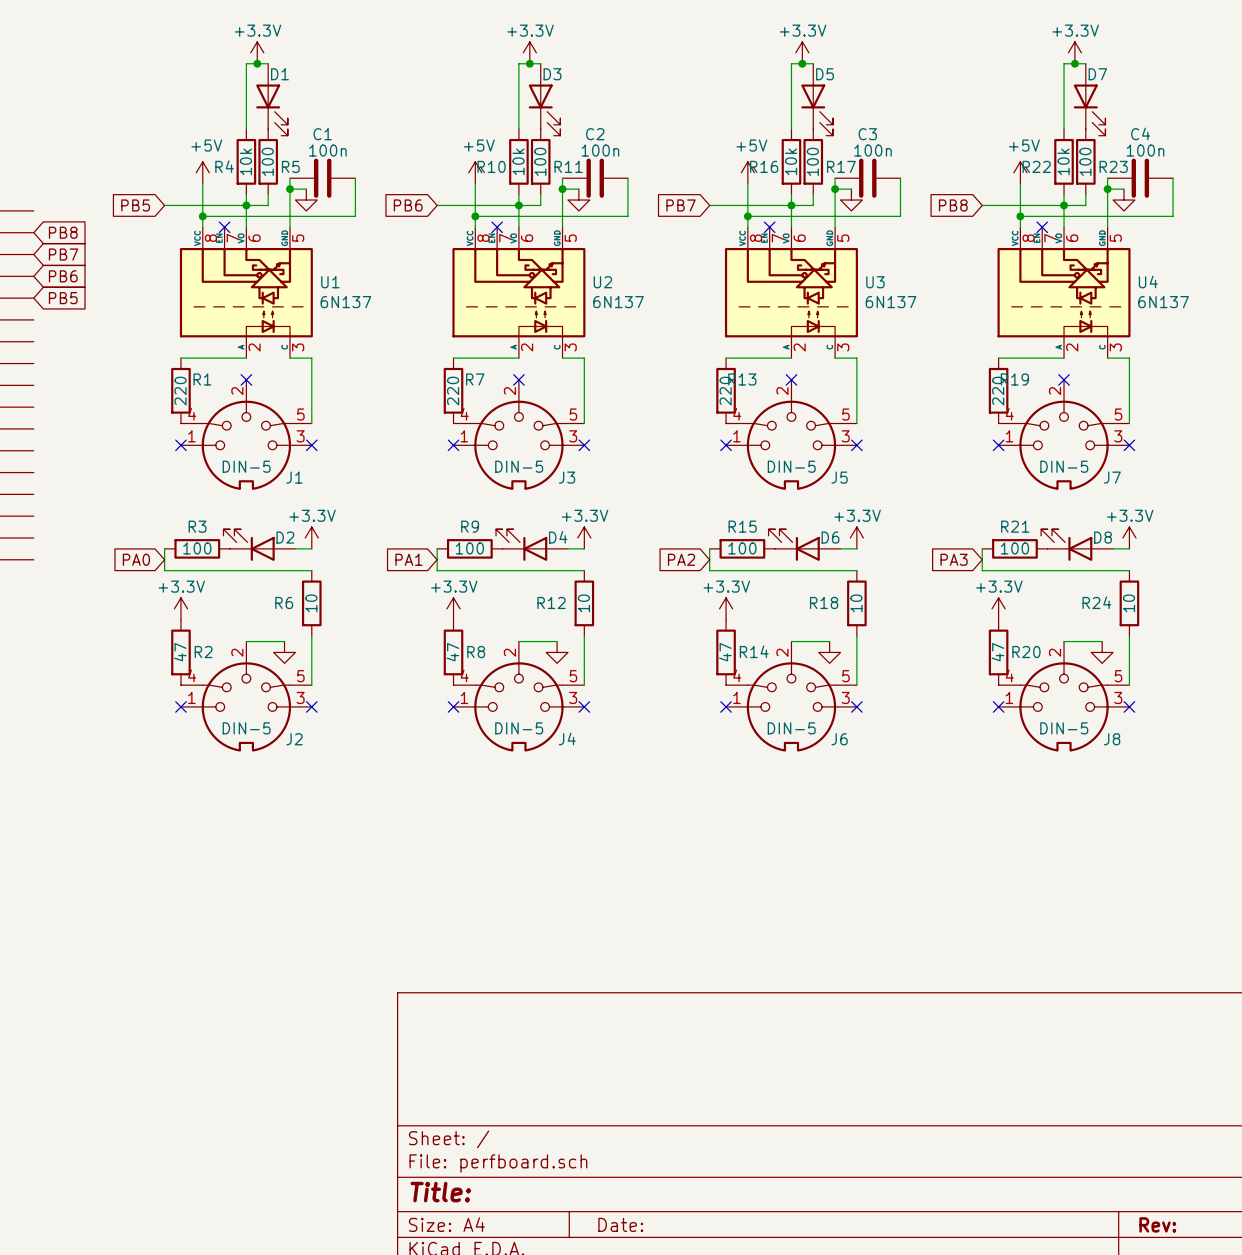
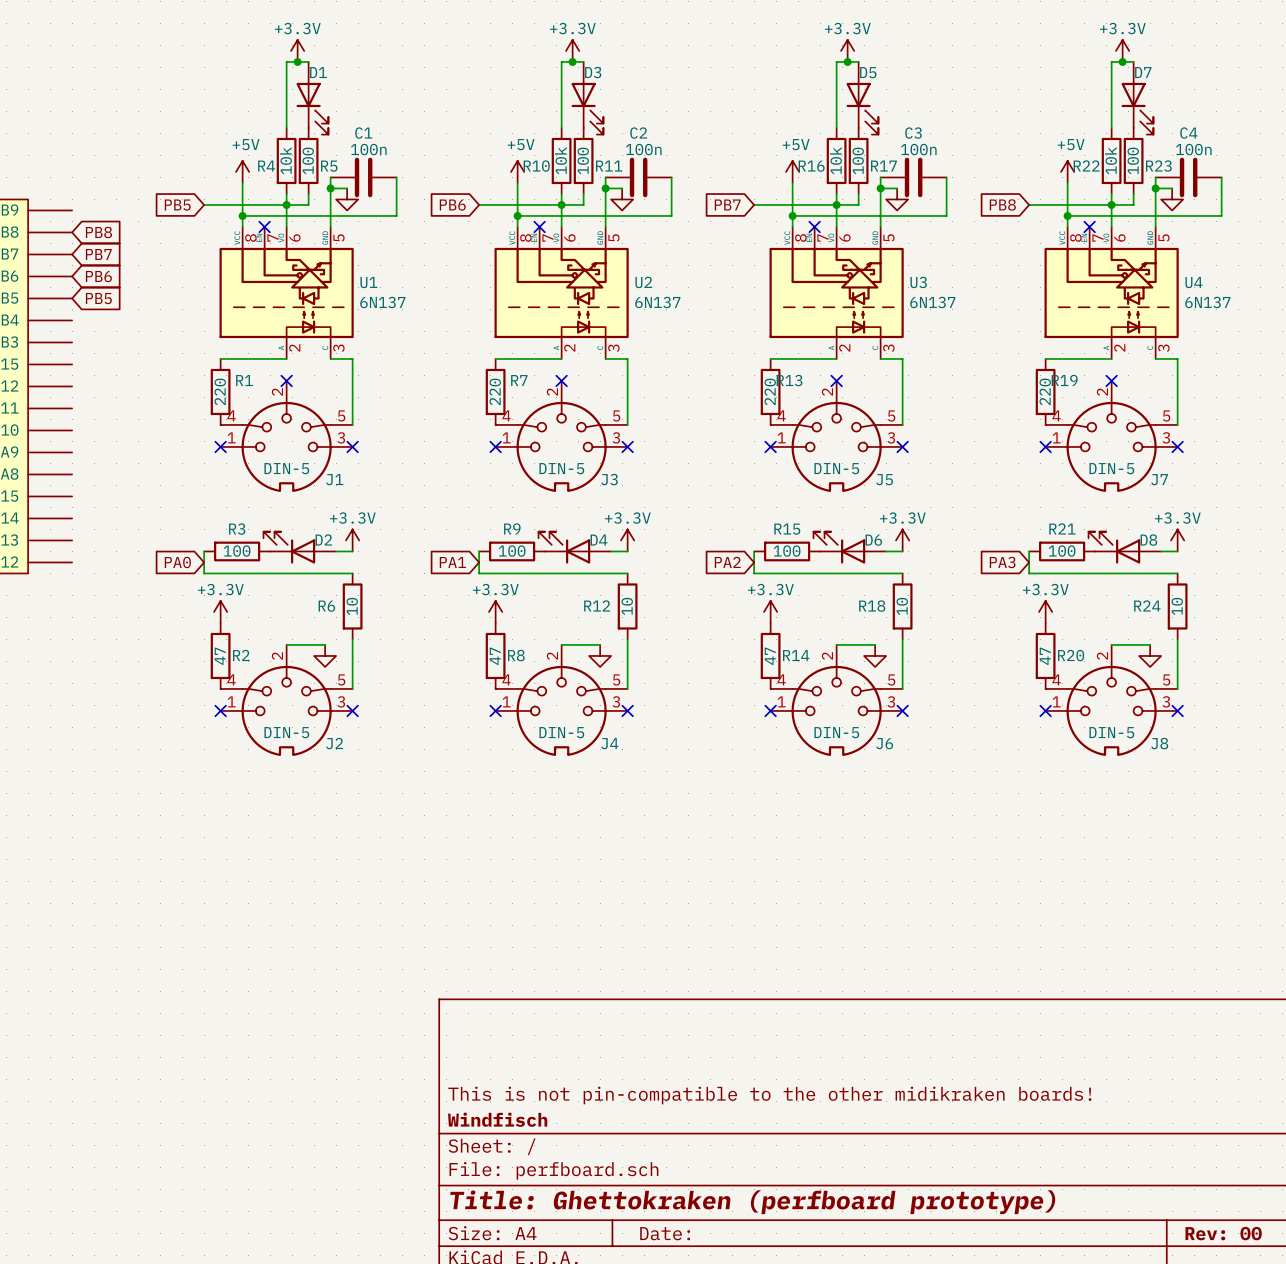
title block: none -> This is not pin-compatible to the other midikraken boards! (769, 1095)
title block: none -> Windfisch (497, 1119)
title block: Title: (440, 1192) -> Title: Ghettokraken (perfboard prototype) (752, 1202)
title block: Rev: (1157, 1224) -> Rev: 00 (1223, 1233)

